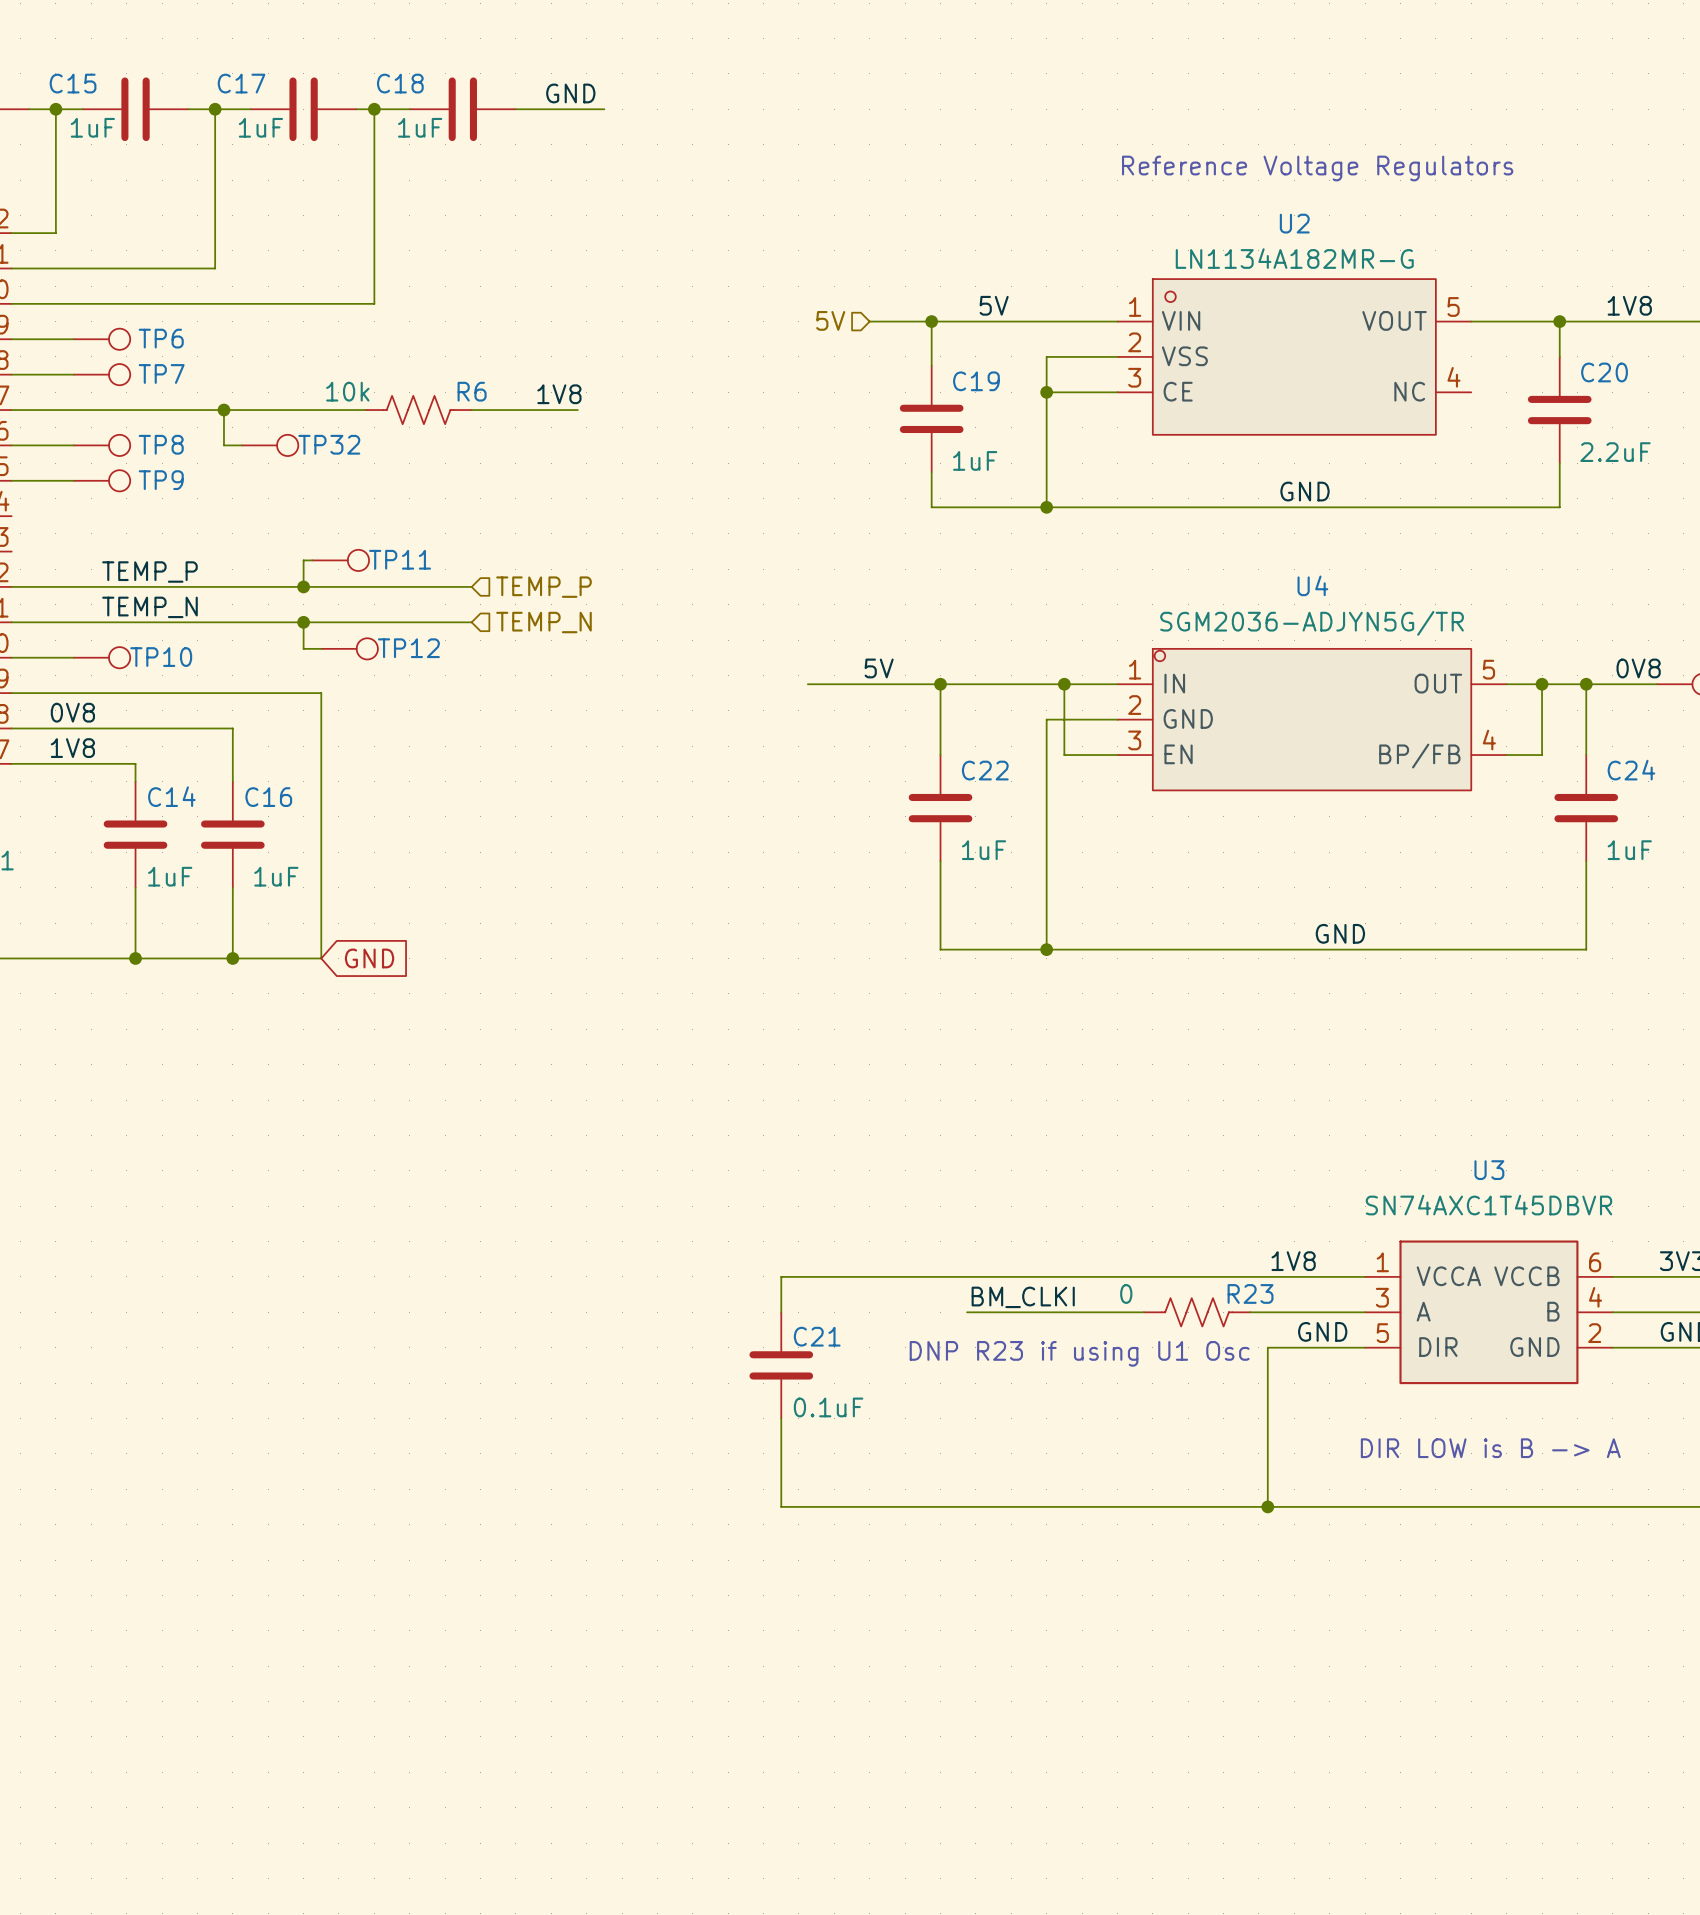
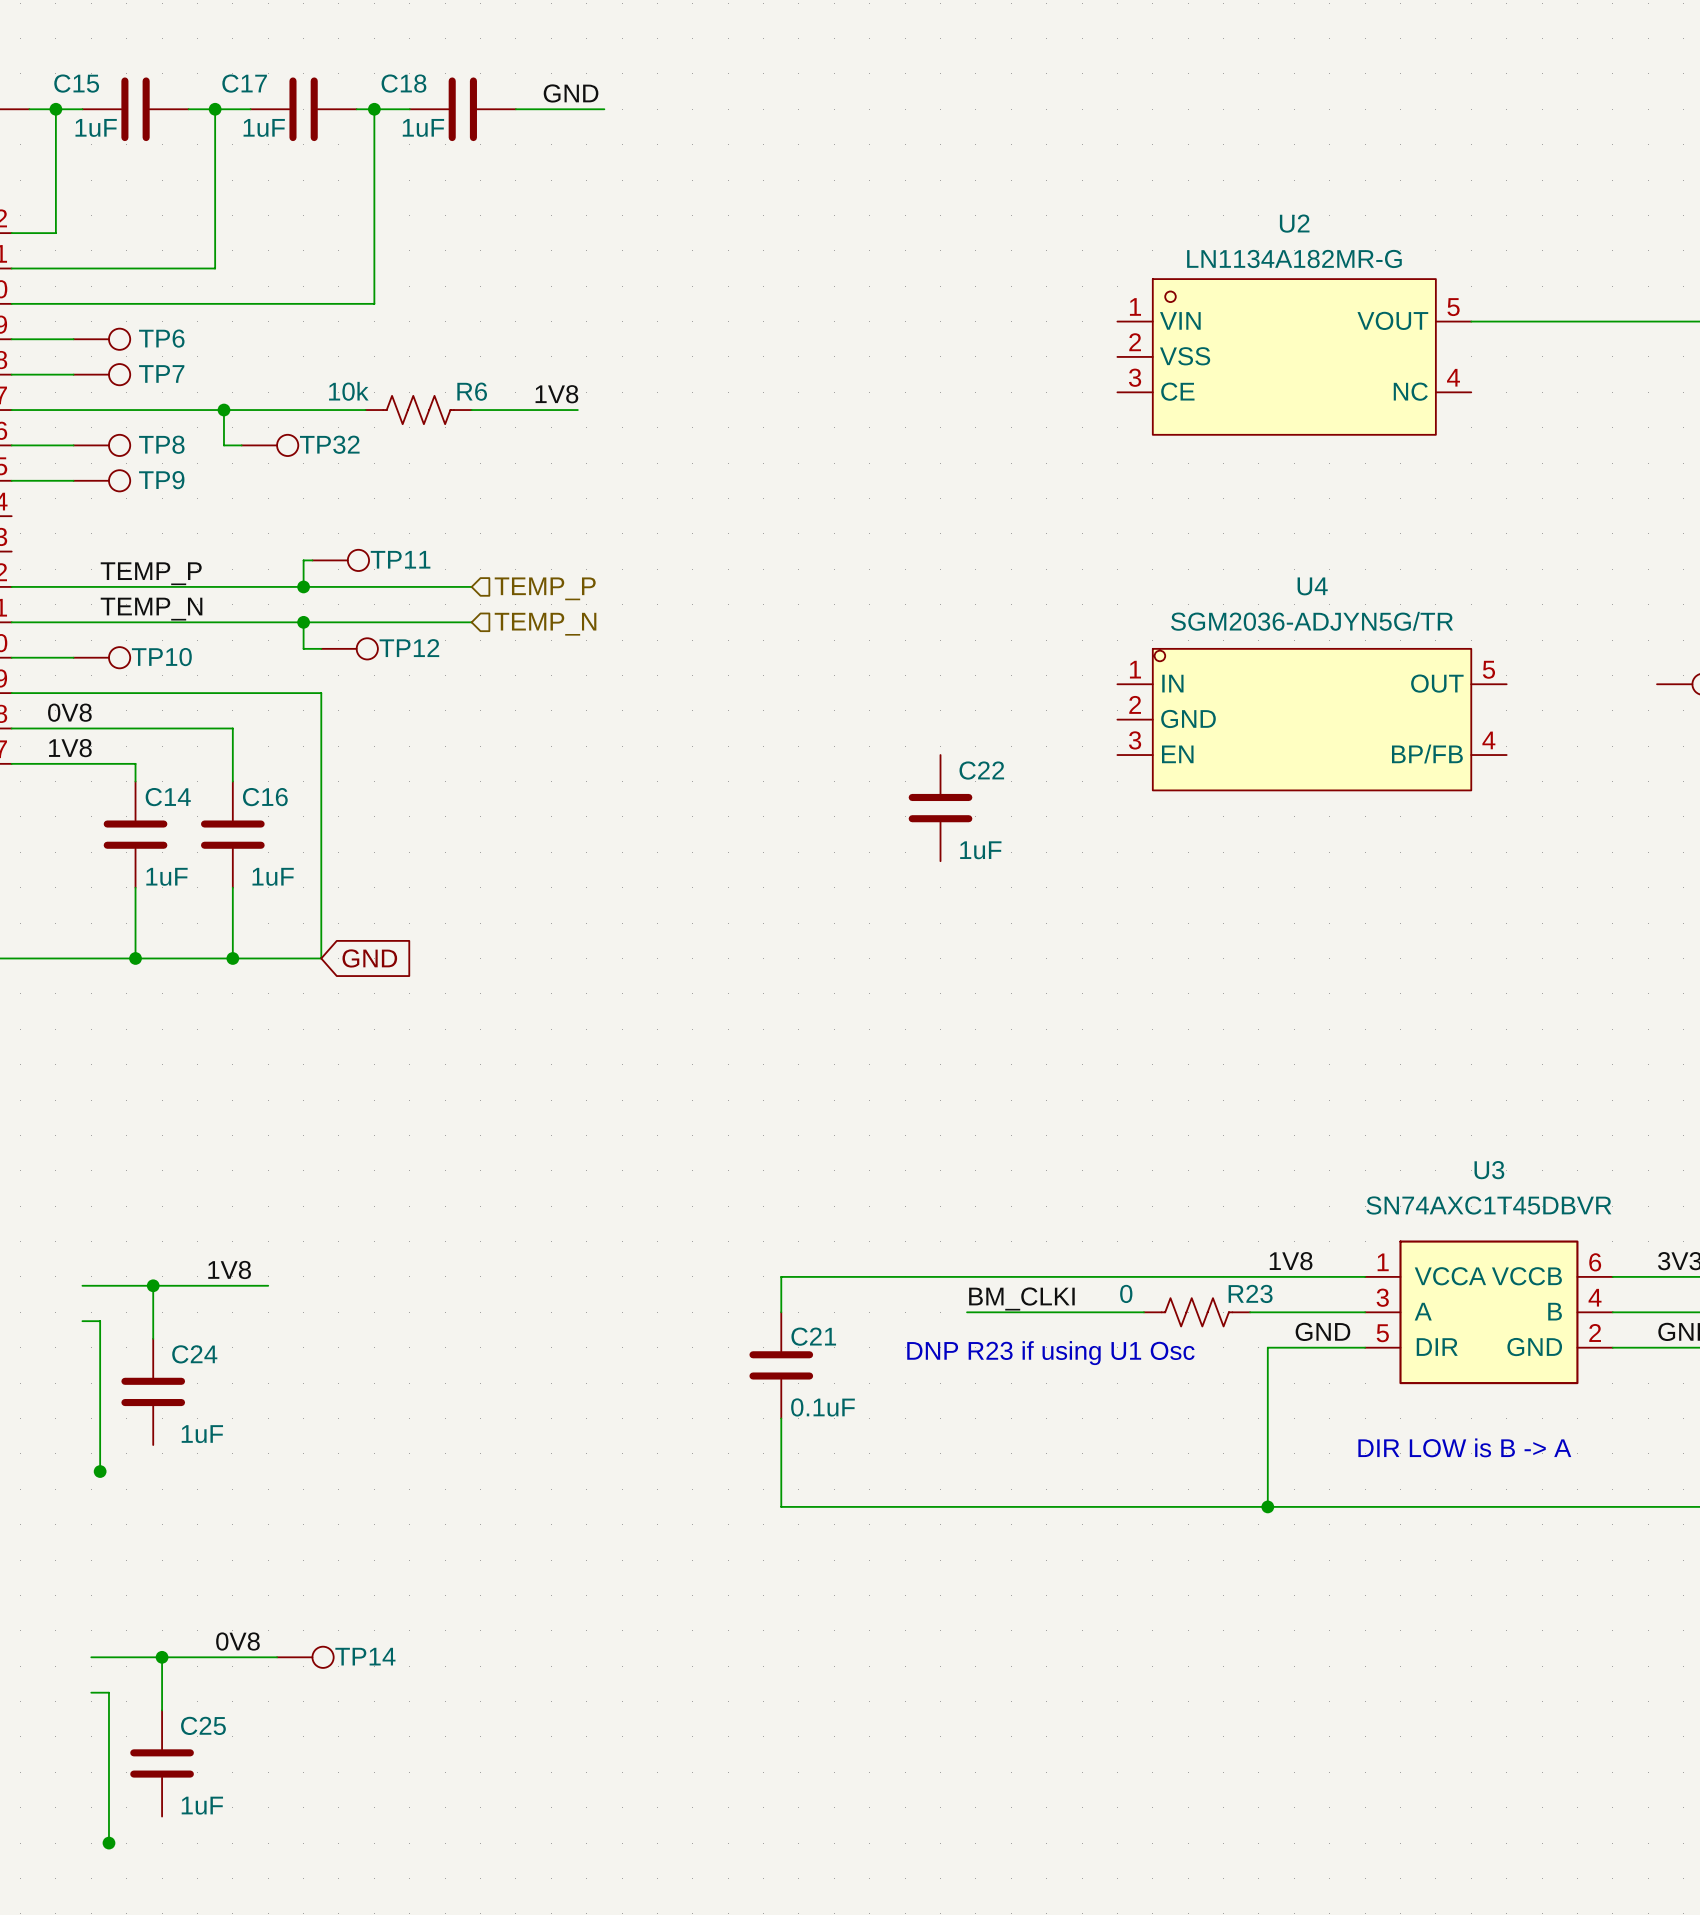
text: Reference Voltage Regulators (1317, 168) -> none
label: 5V (994, 305) -> none
label: 1V8 (1629, 305) -> none
hierarchical label: 5V (830, 320) -> none
wire: (869, 321) (1117, 321) -> none
wire: (931, 321) (931, 365) -> none
junction: (931, 321) -> none
wire: (1559, 321) (1559, 356) -> none
junction: (1559, 321) -> none
wire: (1117, 356) (1046, 356) (1046, 507) -> none
wire: (1046, 392) (1117, 392) -> none
junction: (1046, 392) -> none
C20: 2.2uF (1559, 410) -> none
C19: 1uF (931, 418) -> none
wire: (1559, 463) (1559, 507) (931, 507) (931, 471) -> none
label: GND (1305, 491) -> none
junction: (1046, 507) -> none
label: 5V (879, 668) -> none
label: 0V8 (1638, 668) -> none
wire: (807, 684) (1117, 684) -> none
wire: (940, 684) (940, 755) -> none
junction: (940, 684) -> none
wire: (1064, 684) (1064, 755) (1117, 755) -> none
junction: (1064, 684) -> none
wire: (1506, 684) (1657, 684) -> none
wire: (1542, 684) (1542, 755) (1506, 755) -> none
junction: (1542, 684) -> none
wire: (1586, 684) (1586, 755) -> none
junction: (1586, 684) -> none
wire: (1117, 719) (1046, 719) (1046, 949) -> none
C24 position: (1586, 808) -> (153, 1391)
C24 value position: 1uF (1629, 850) -> 1uF (202, 1434)
wire: (940, 861) (940, 949) (1586, 949) (1586, 861) -> none
label: GND (1340, 933) -> none
junction: (1046, 949) -> none
label: none -> 1V8 (229, 1269)
wire: none -> (82, 1285) (268, 1285)
wire: none -> (153, 1285) (153, 1338)
junction: none -> (153, 1285)
wire: none -> (82, 1321) (100, 1321) (100, 1471)
junction: none -> (100, 1471)
label: none -> 0V8 (237, 1641)
wire: none -> (91, 1657) (277, 1657)
wire: none -> (162, 1657) (162, 1710)
junction: none -> (162, 1657)
TP14: none -> (305, 1657)
wire: none -> (91, 1692) (108, 1692) (108, 1843)
C25: none -> 1uF (162, 1763)
junction: none -> (108, 1843)

